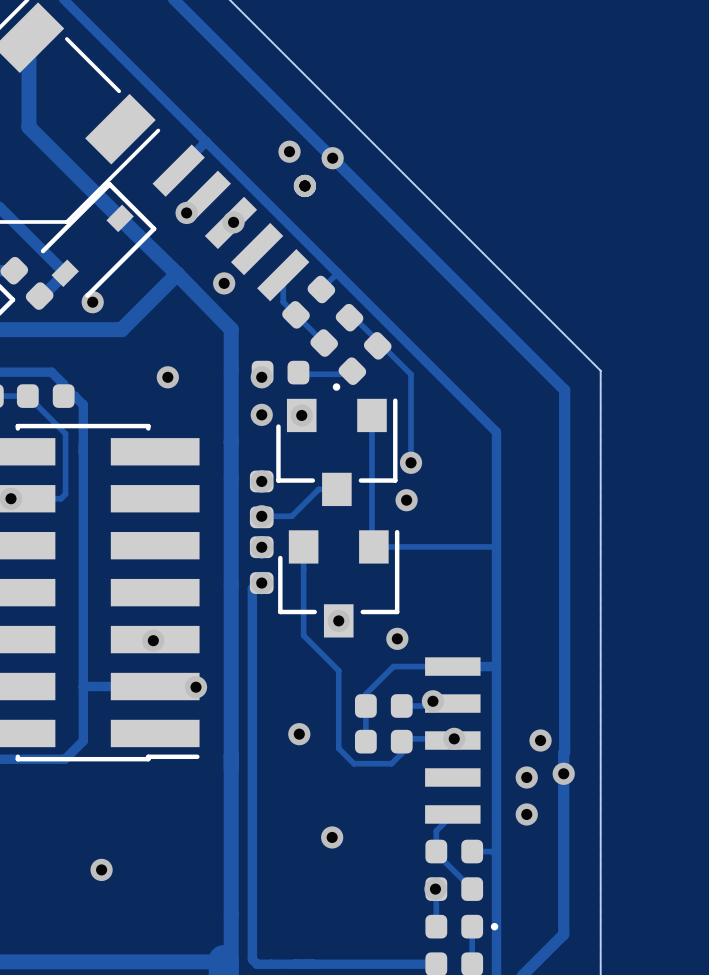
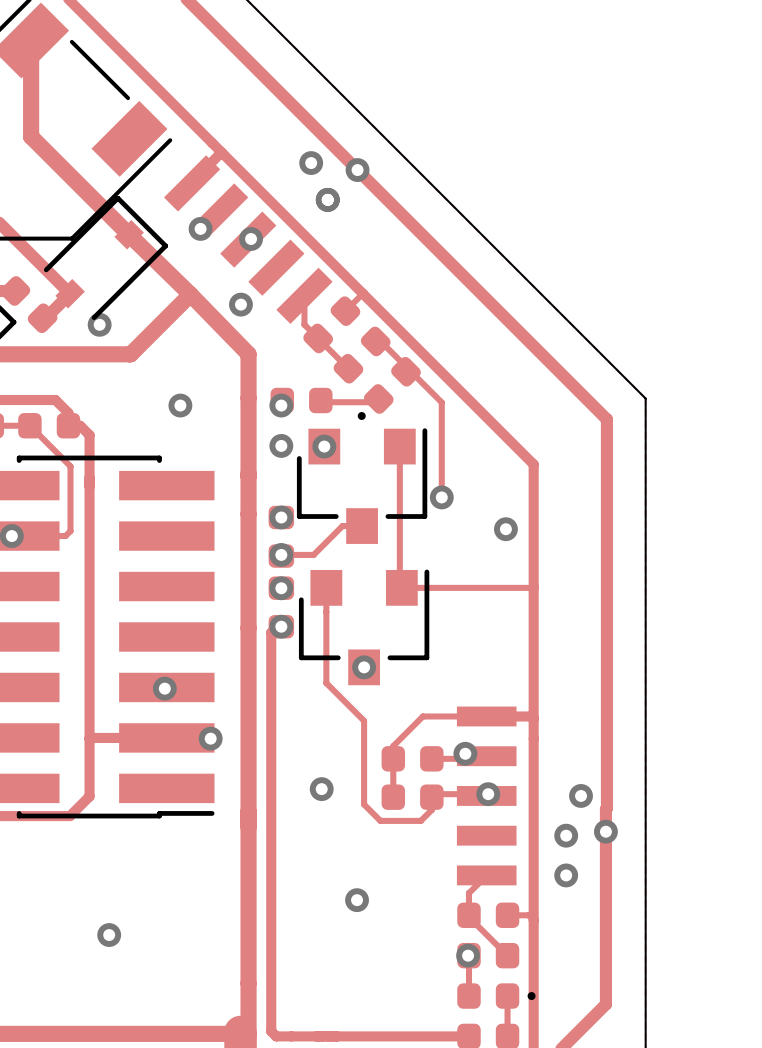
via position: (406, 500) -> (505, 529)
via: (397, 638) -> none

